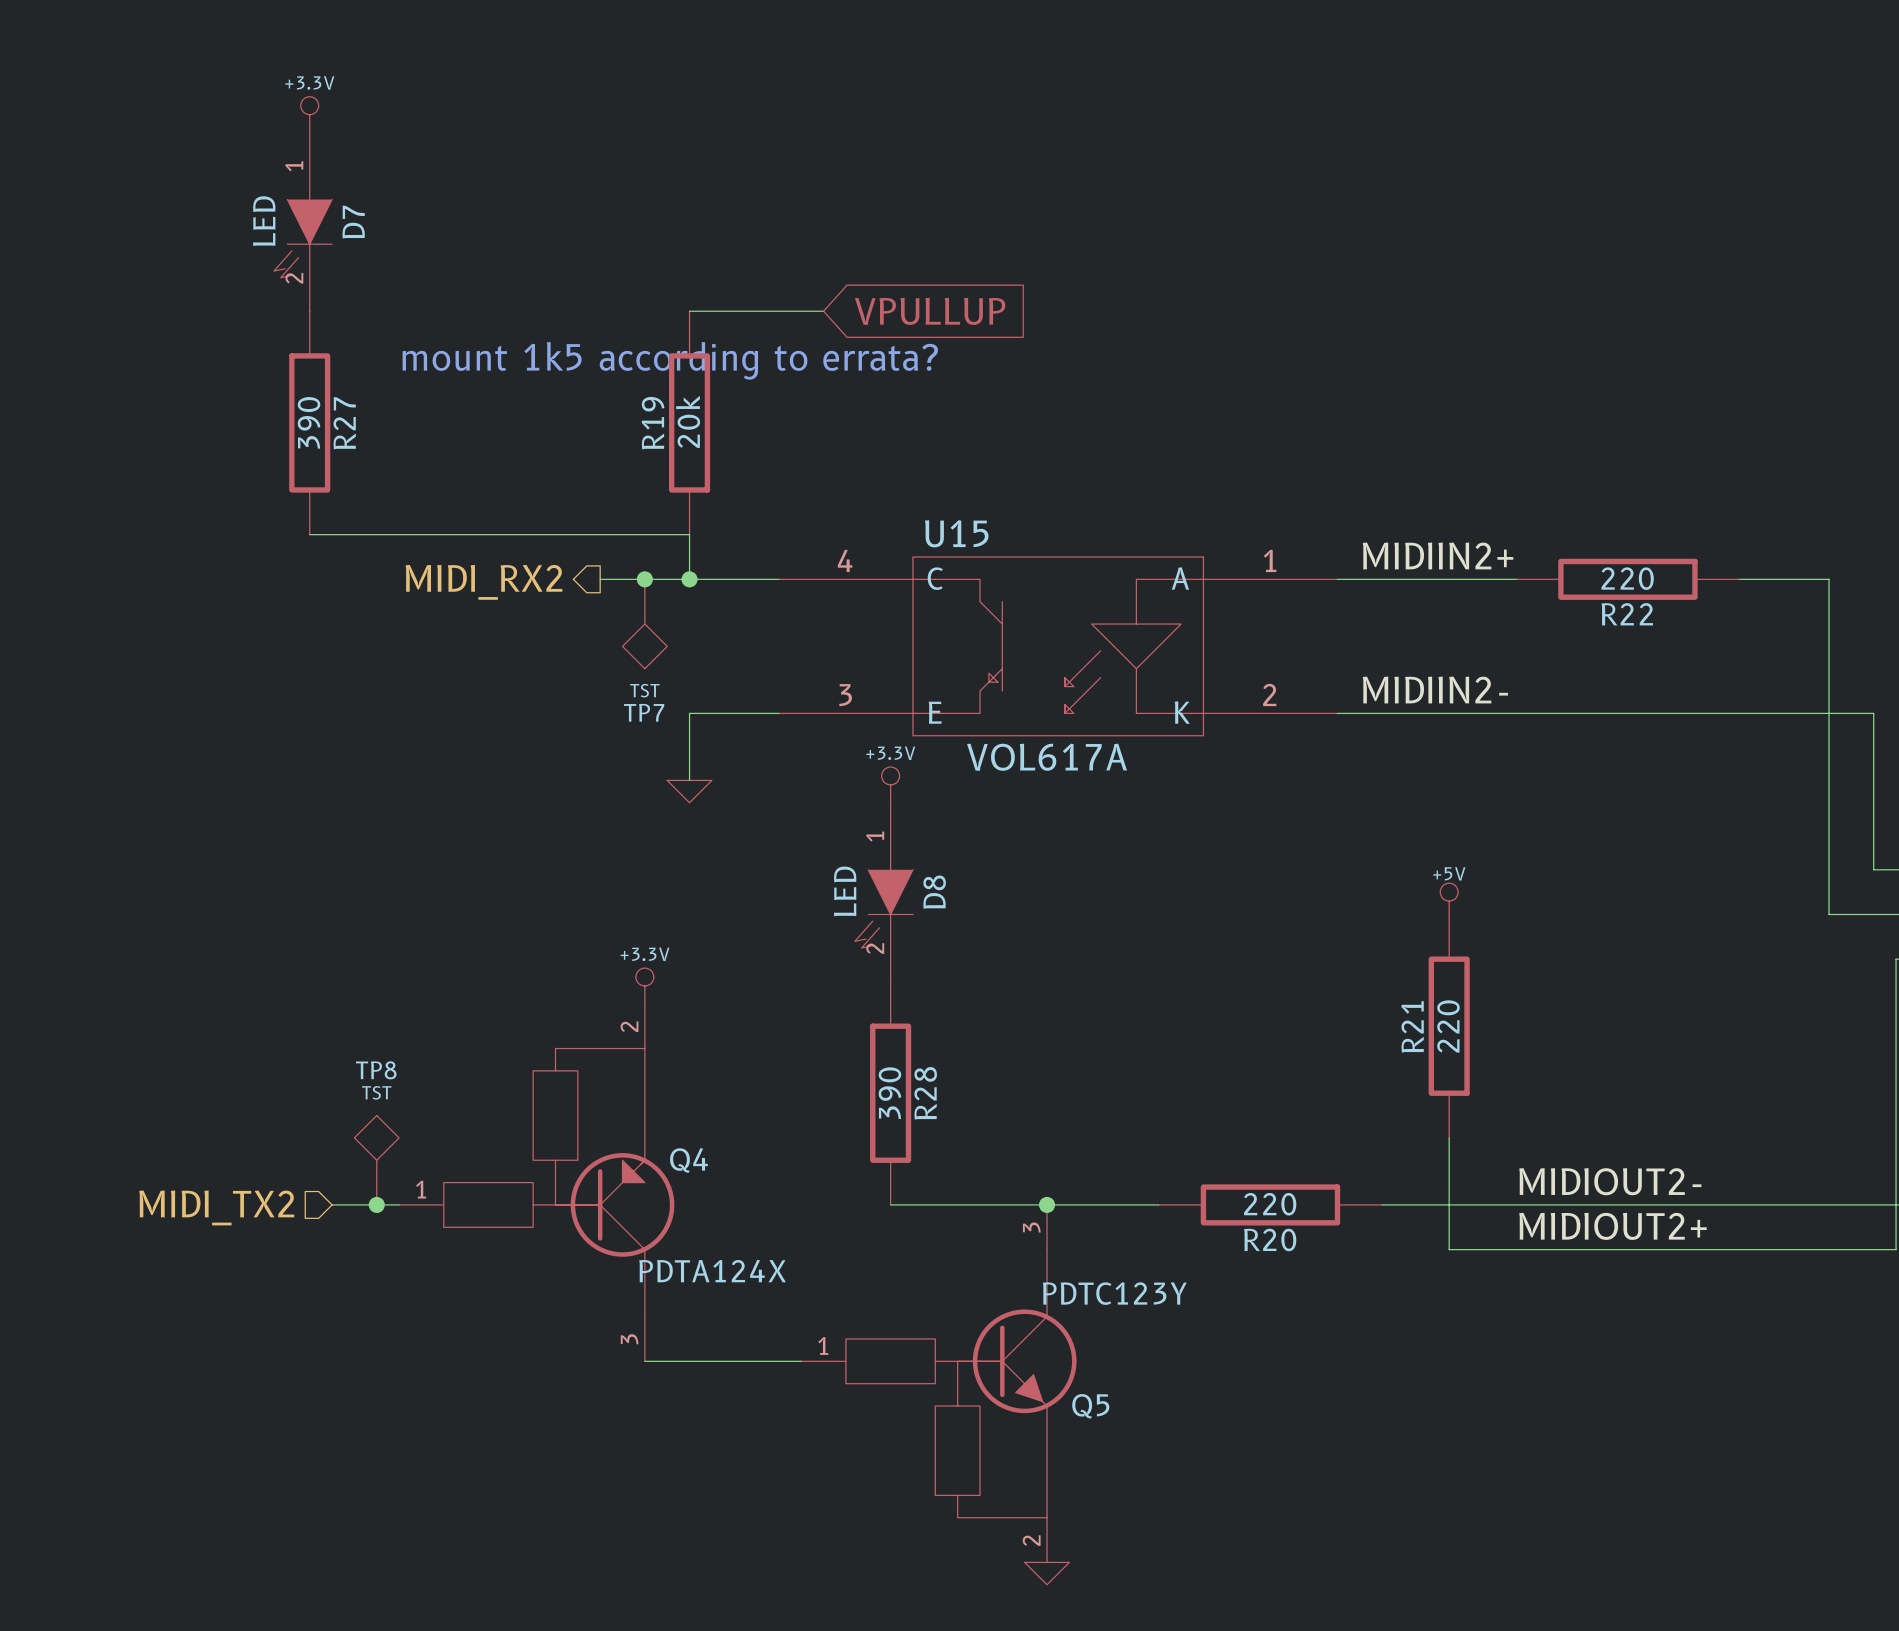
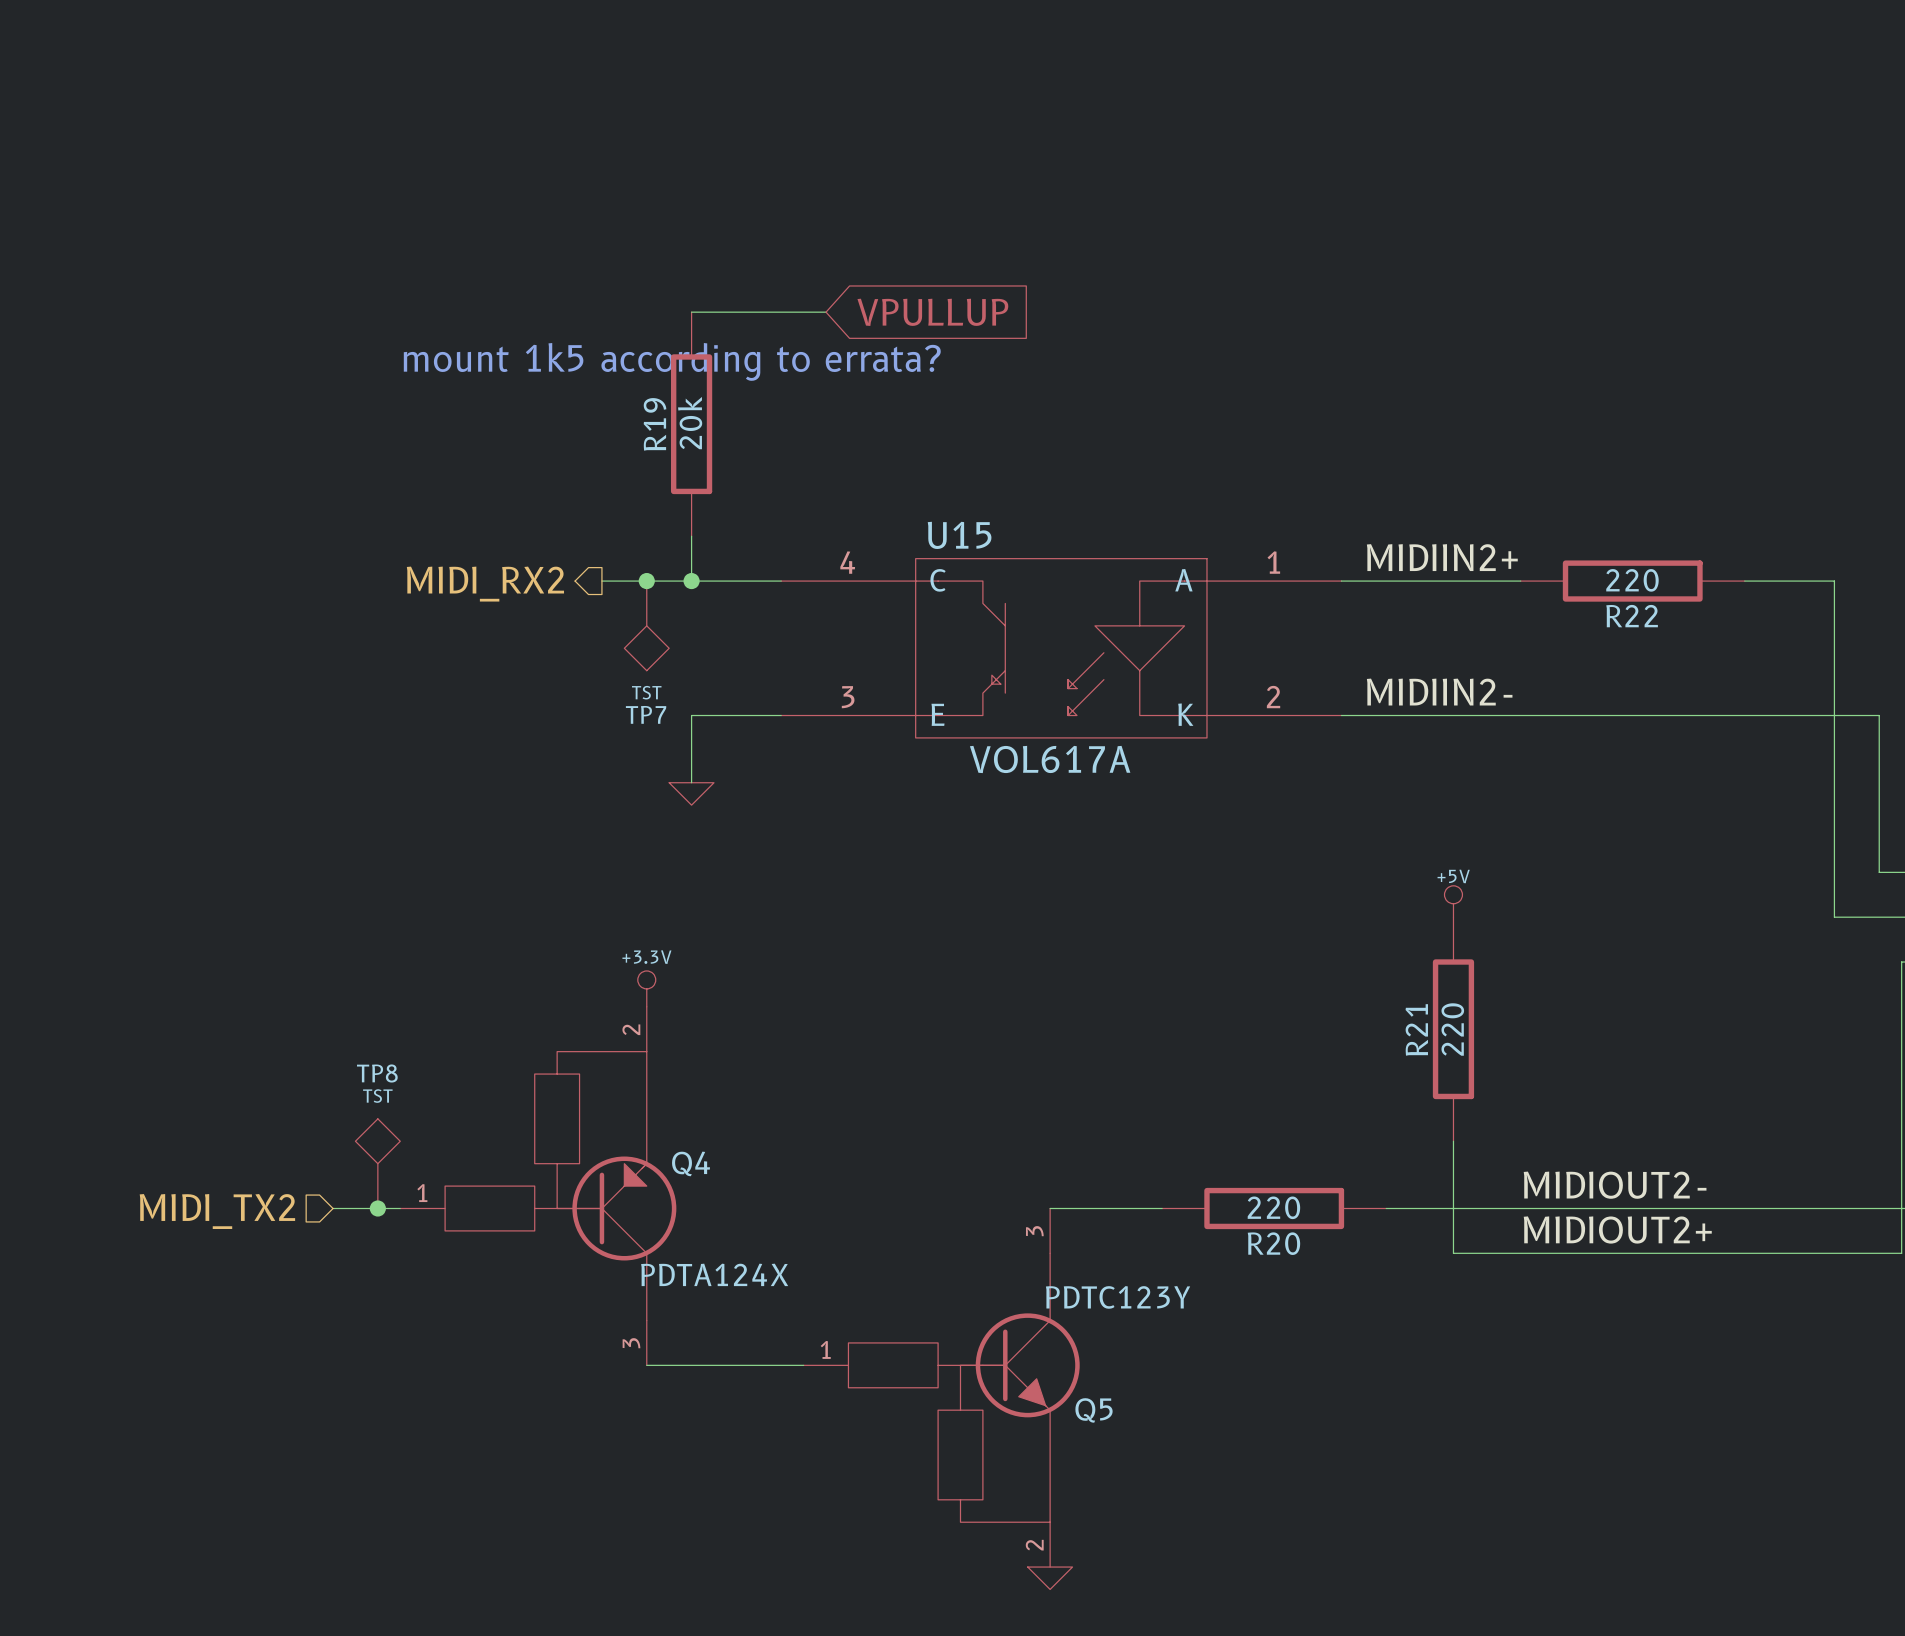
power symbol: +3.3V (309, 114) -> none
D7: LED (303, 221) -> none
R27: 390 (309, 422) -> none
wire: (309, 534) (689, 534) -> none
power symbol: +3.3V (890, 784) -> none
D8: LED (883, 892) -> none
R28: 390 (890, 1093) -> none
wire: (890, 1204) (1047, 1204) -> none
junction: (1047, 1204) -> none

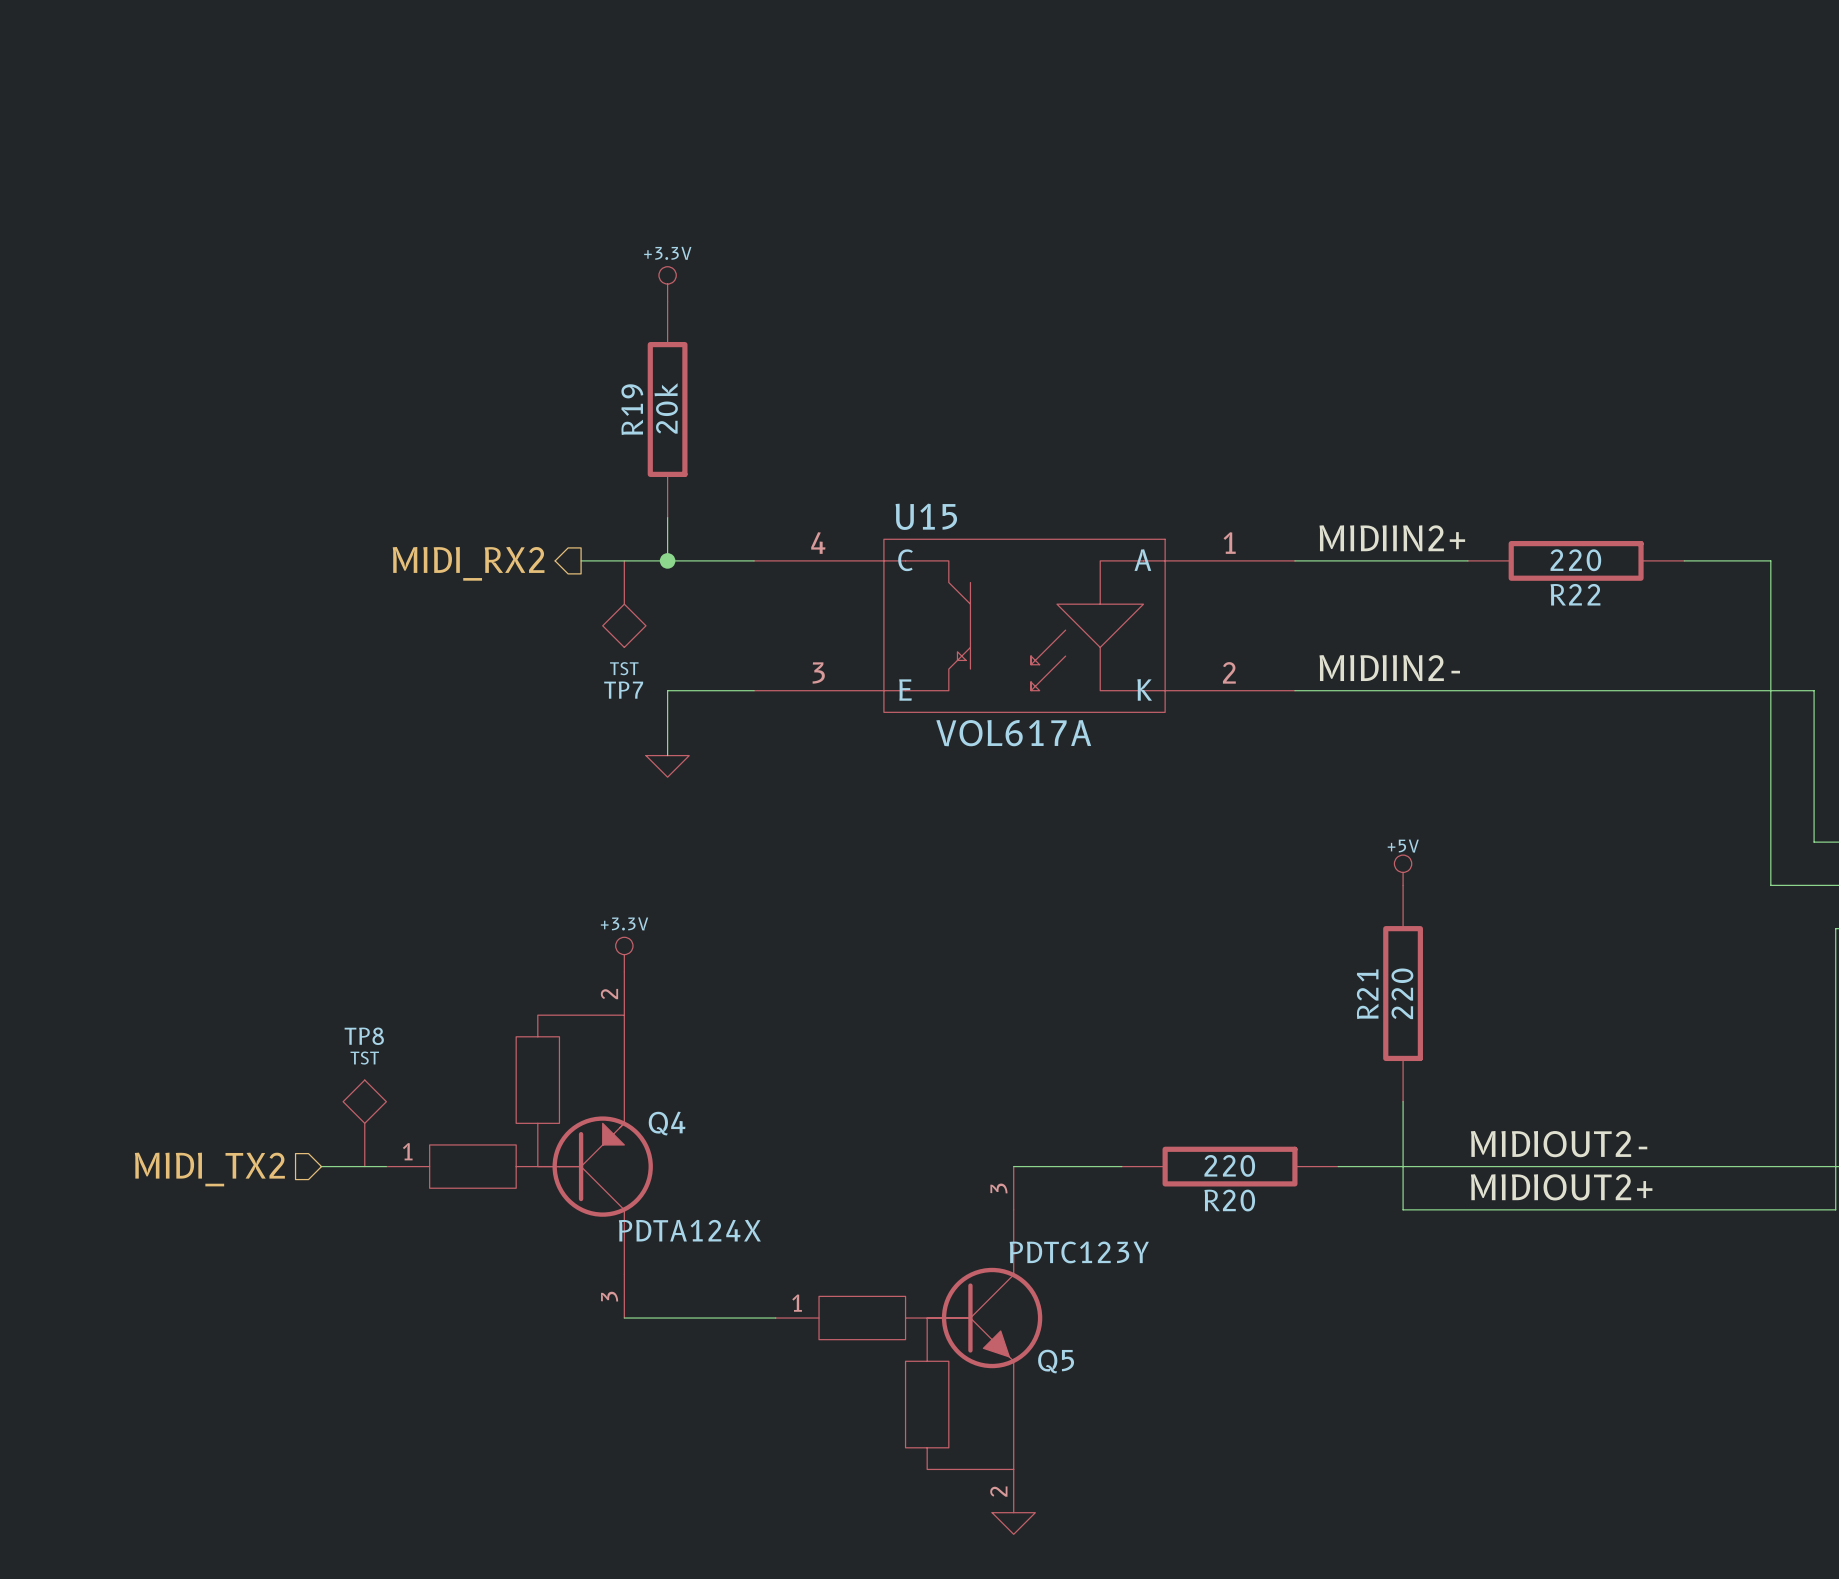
power symbol: none -> +3.3V (667, 284)
wire: (691, 312) (826, 312) -> none
global label: VPULLUP (932, 312) -> none
text: mount 1k5 according to errata? (672, 361) -> none
junction: (646, 581) -> none
junction: (377, 1208) -> none

